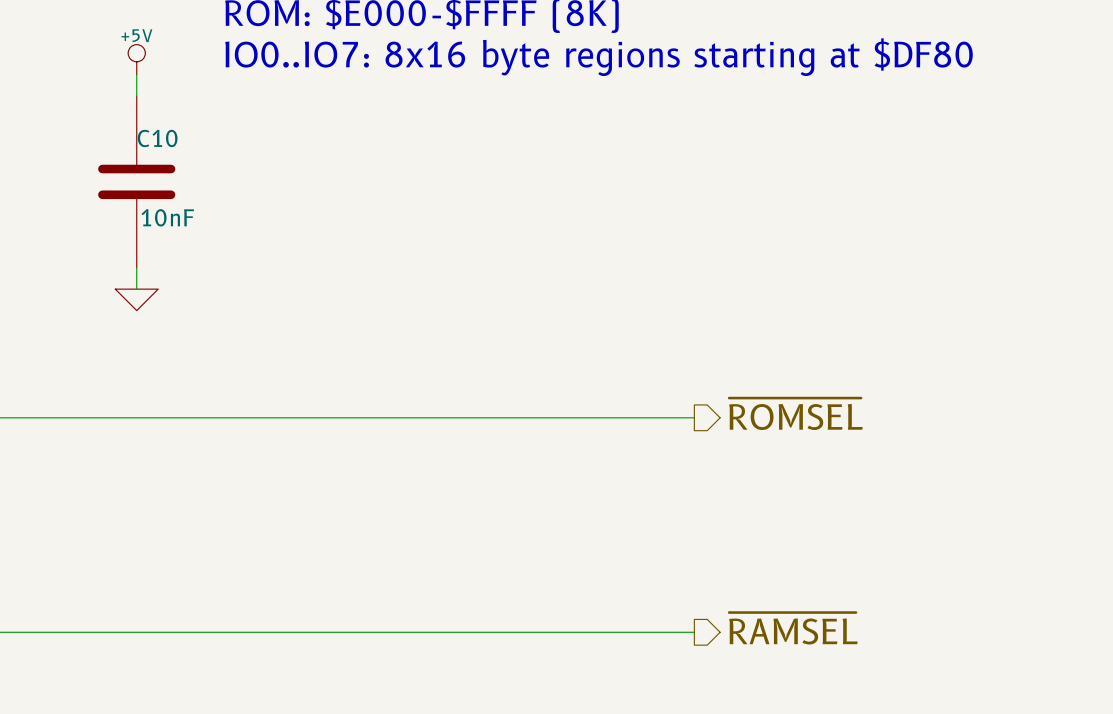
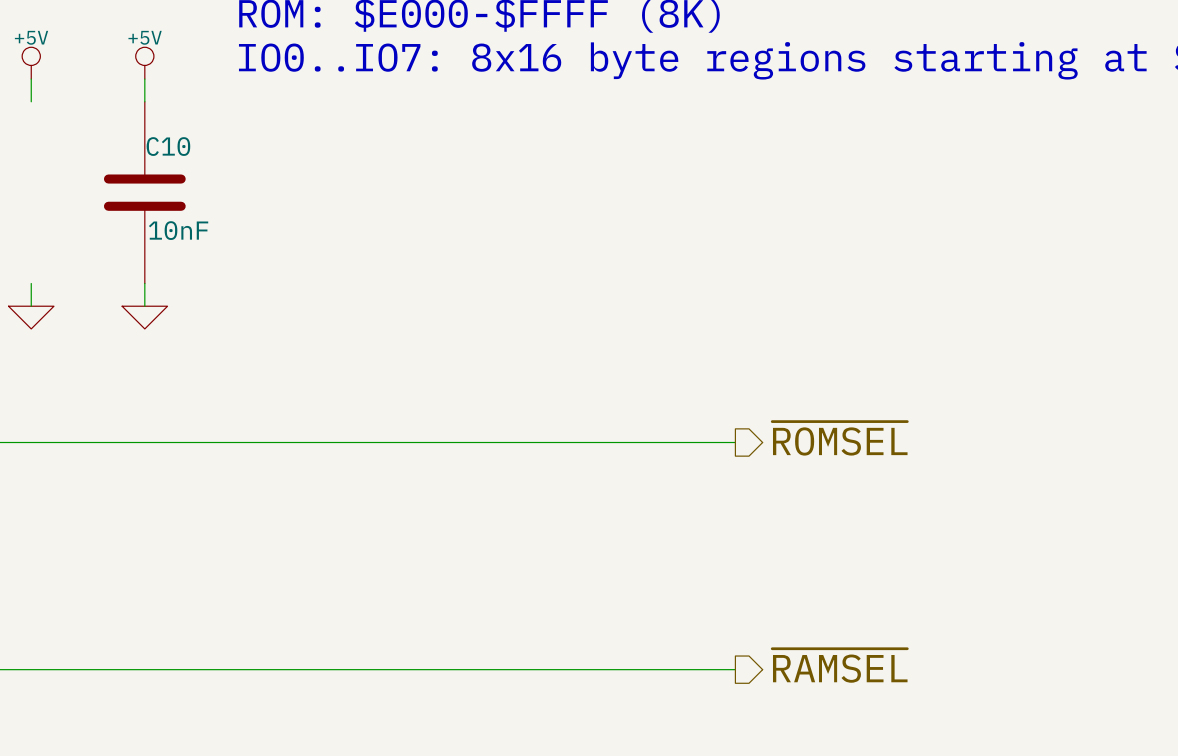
power symbol: none -> +5V (31, 63)
wire: none -> (31, 79) (31, 101)
wire: none -> (31, 283) (31, 306)
power symbol: none -> (31, 317)

